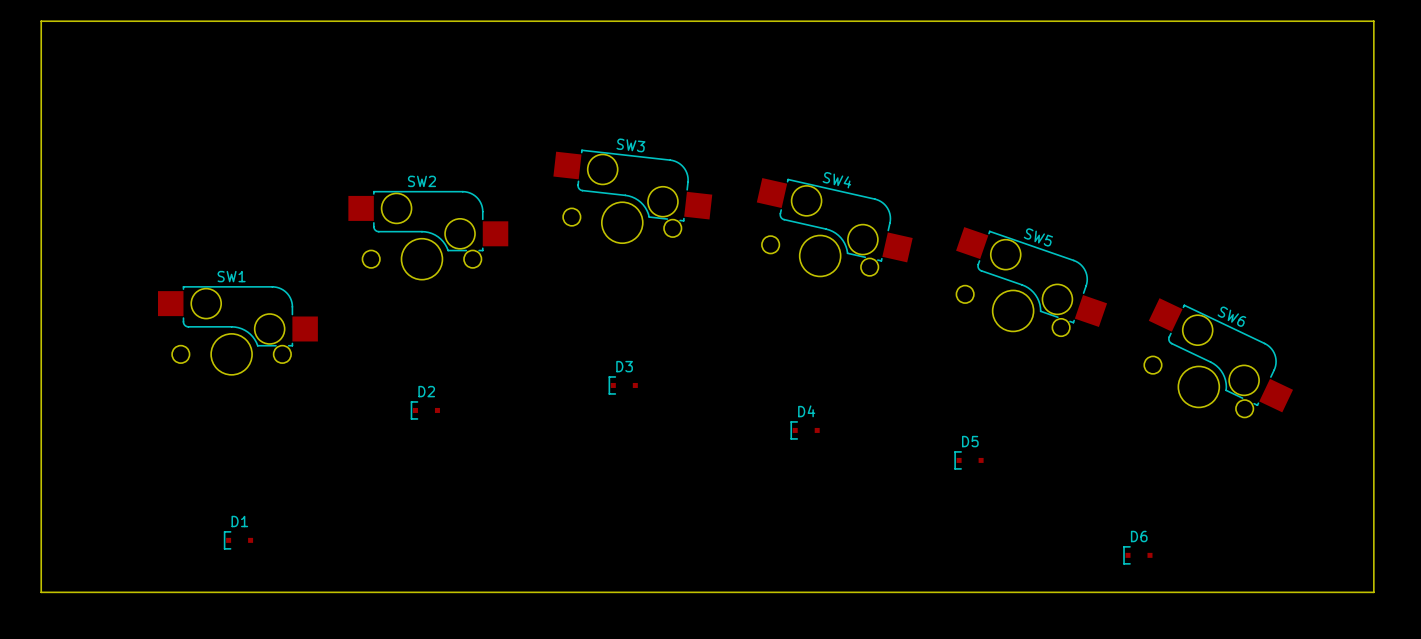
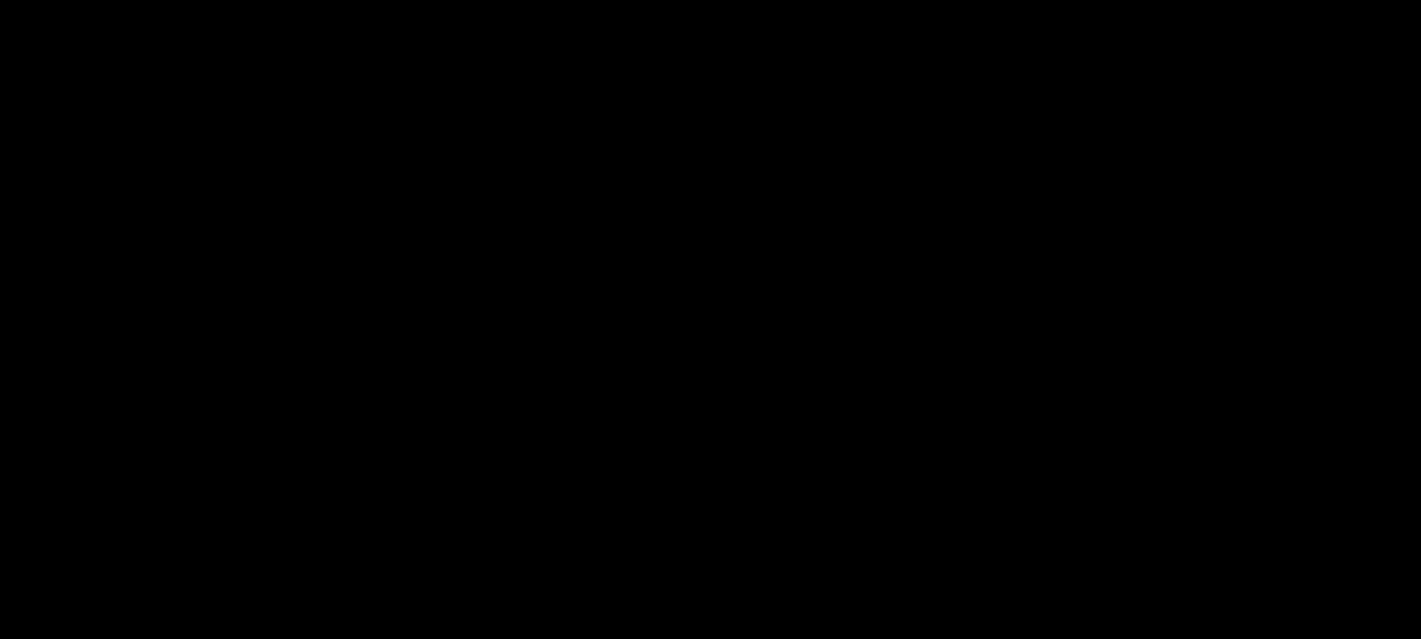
board edge: (41, 21) (1373, 21) (1373, 592) (41, 592) (41, 21) -> none
SW3: (632, 196) -> none
SW4: (834, 227) -> none
SW2: (428, 235) -> none
SW5: (1031, 281) -> none
SW1: (237, 330) -> none
SW6: (1218, 358) -> none
D3: (623, 385) -> none
D2: (425, 410) -> none
D4: (805, 430) -> none
D5: (969, 460) -> none
D1: (238, 540) -> none
D6: (1137, 555) -> none

